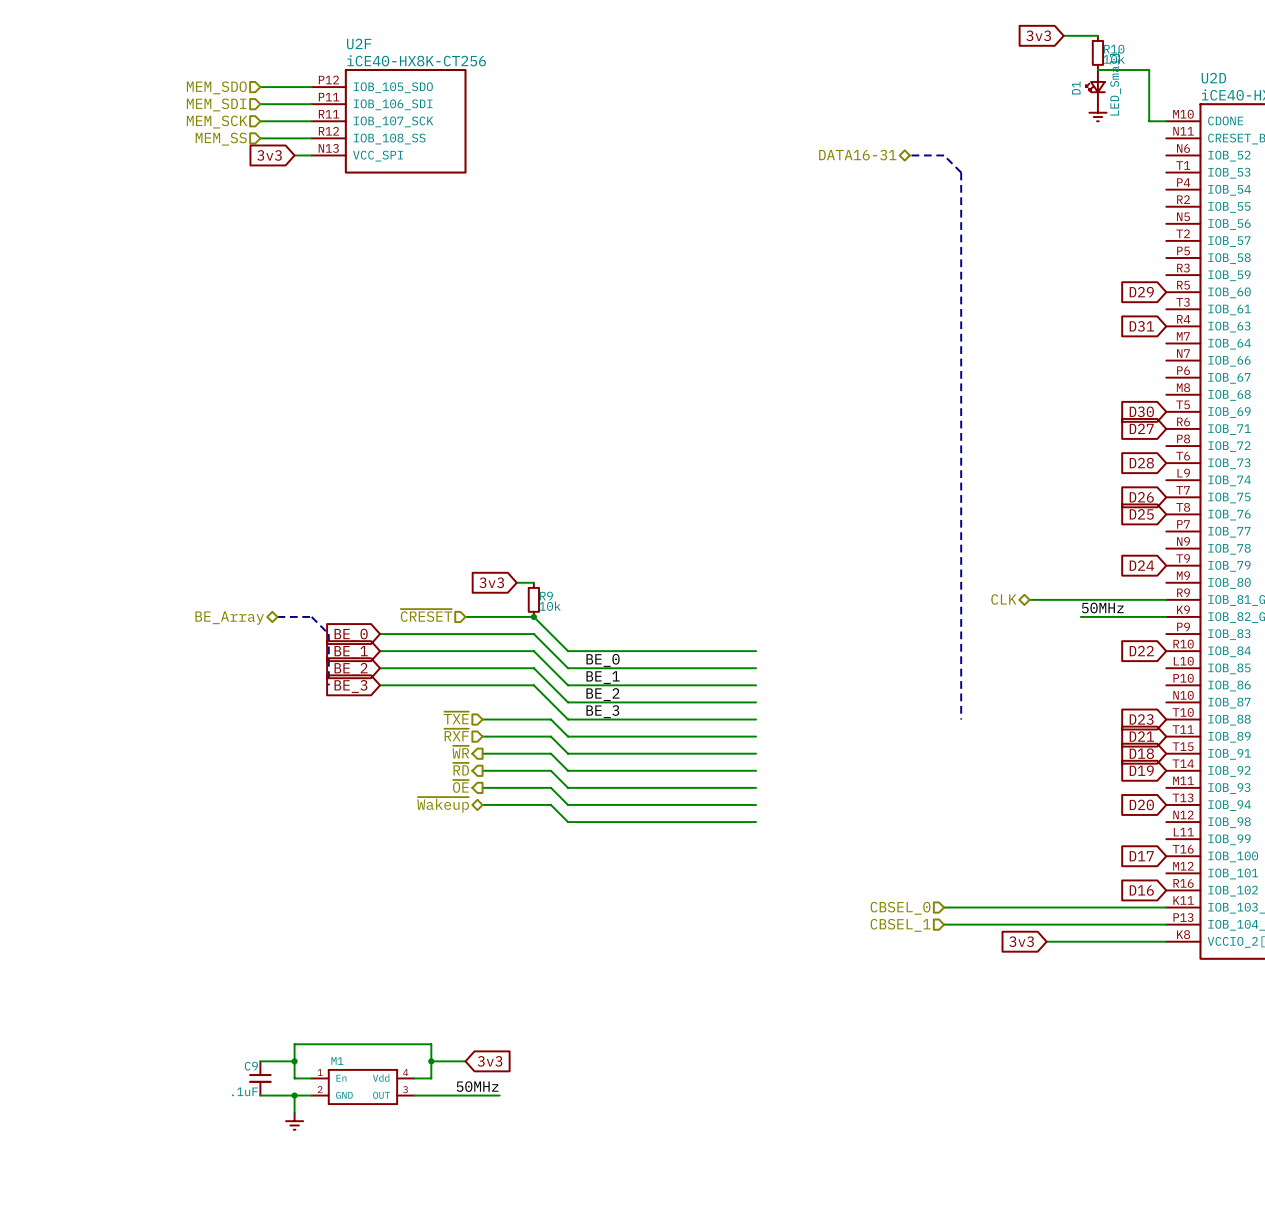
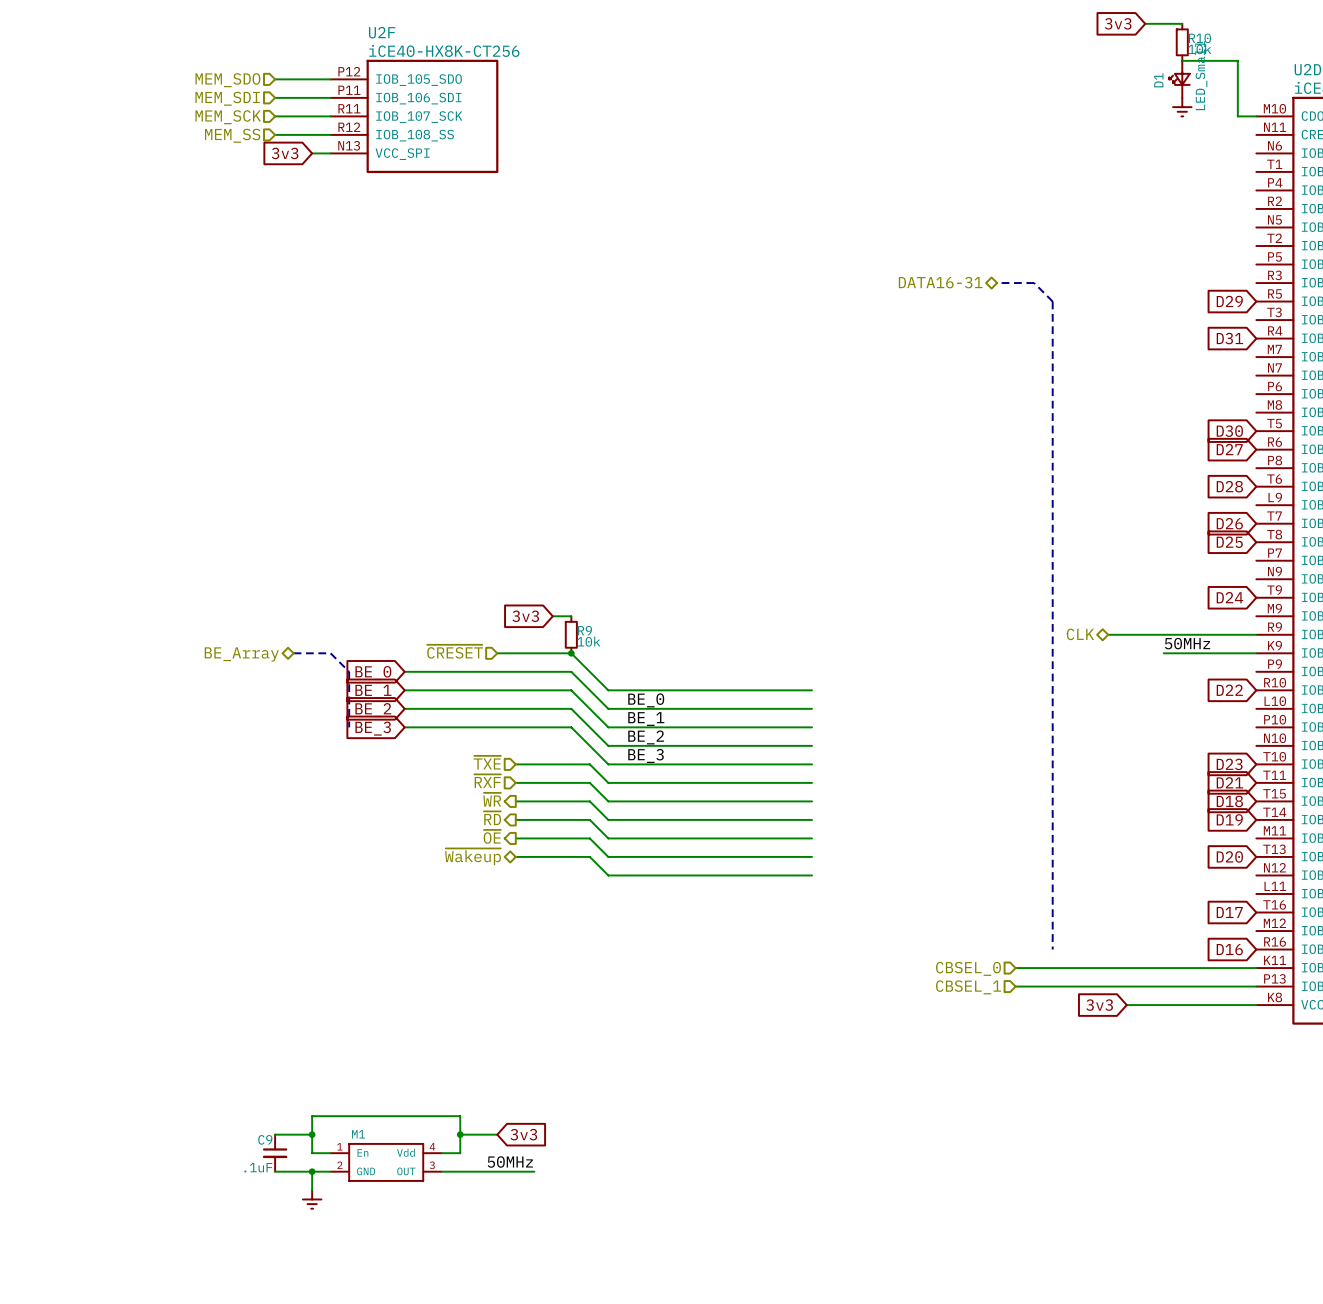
hierarchical label position: DATA16-31 (857, 155) -> DATA16-31 (940, 282)
line: (909, 155) (944, 155) (961, 172) (961, 719) -> none
line: none -> (997, 283) (1034, 283) (1052, 301) (1052, 949)

